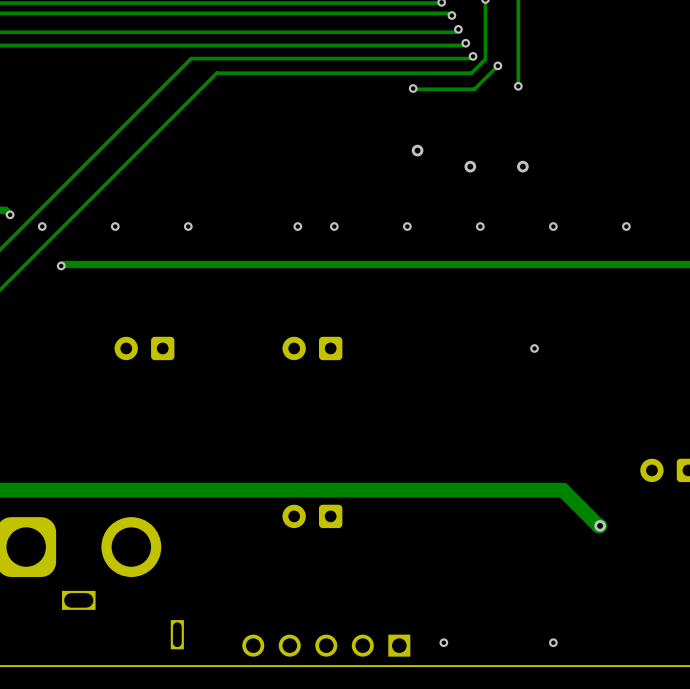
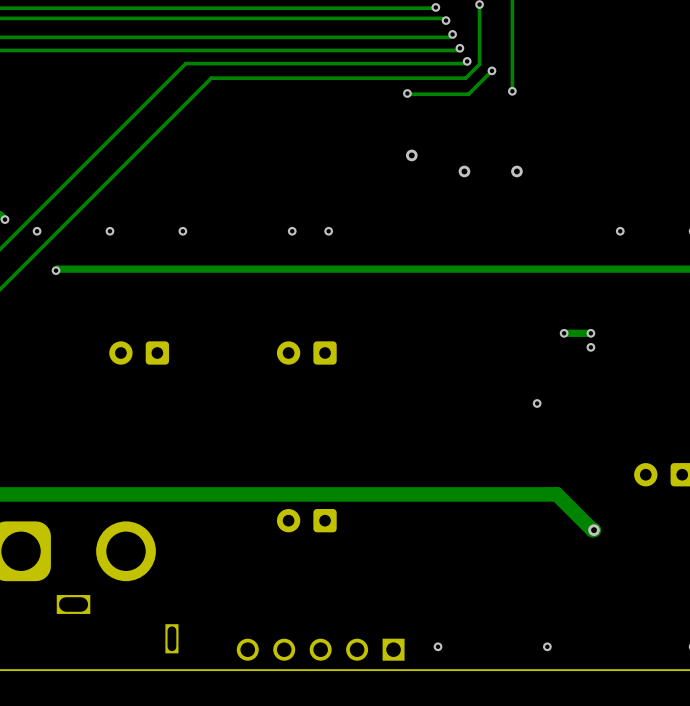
via: (407, 226) -> none
via: (480, 226) -> none
via: (553, 226) -> none
via: none -> (564, 333)
track: none -> (590, 333) (564, 333)
via: none -> (590, 333)
via: none -> (590, 347)
via: (534, 348) -> none
via: none -> (537, 403)

